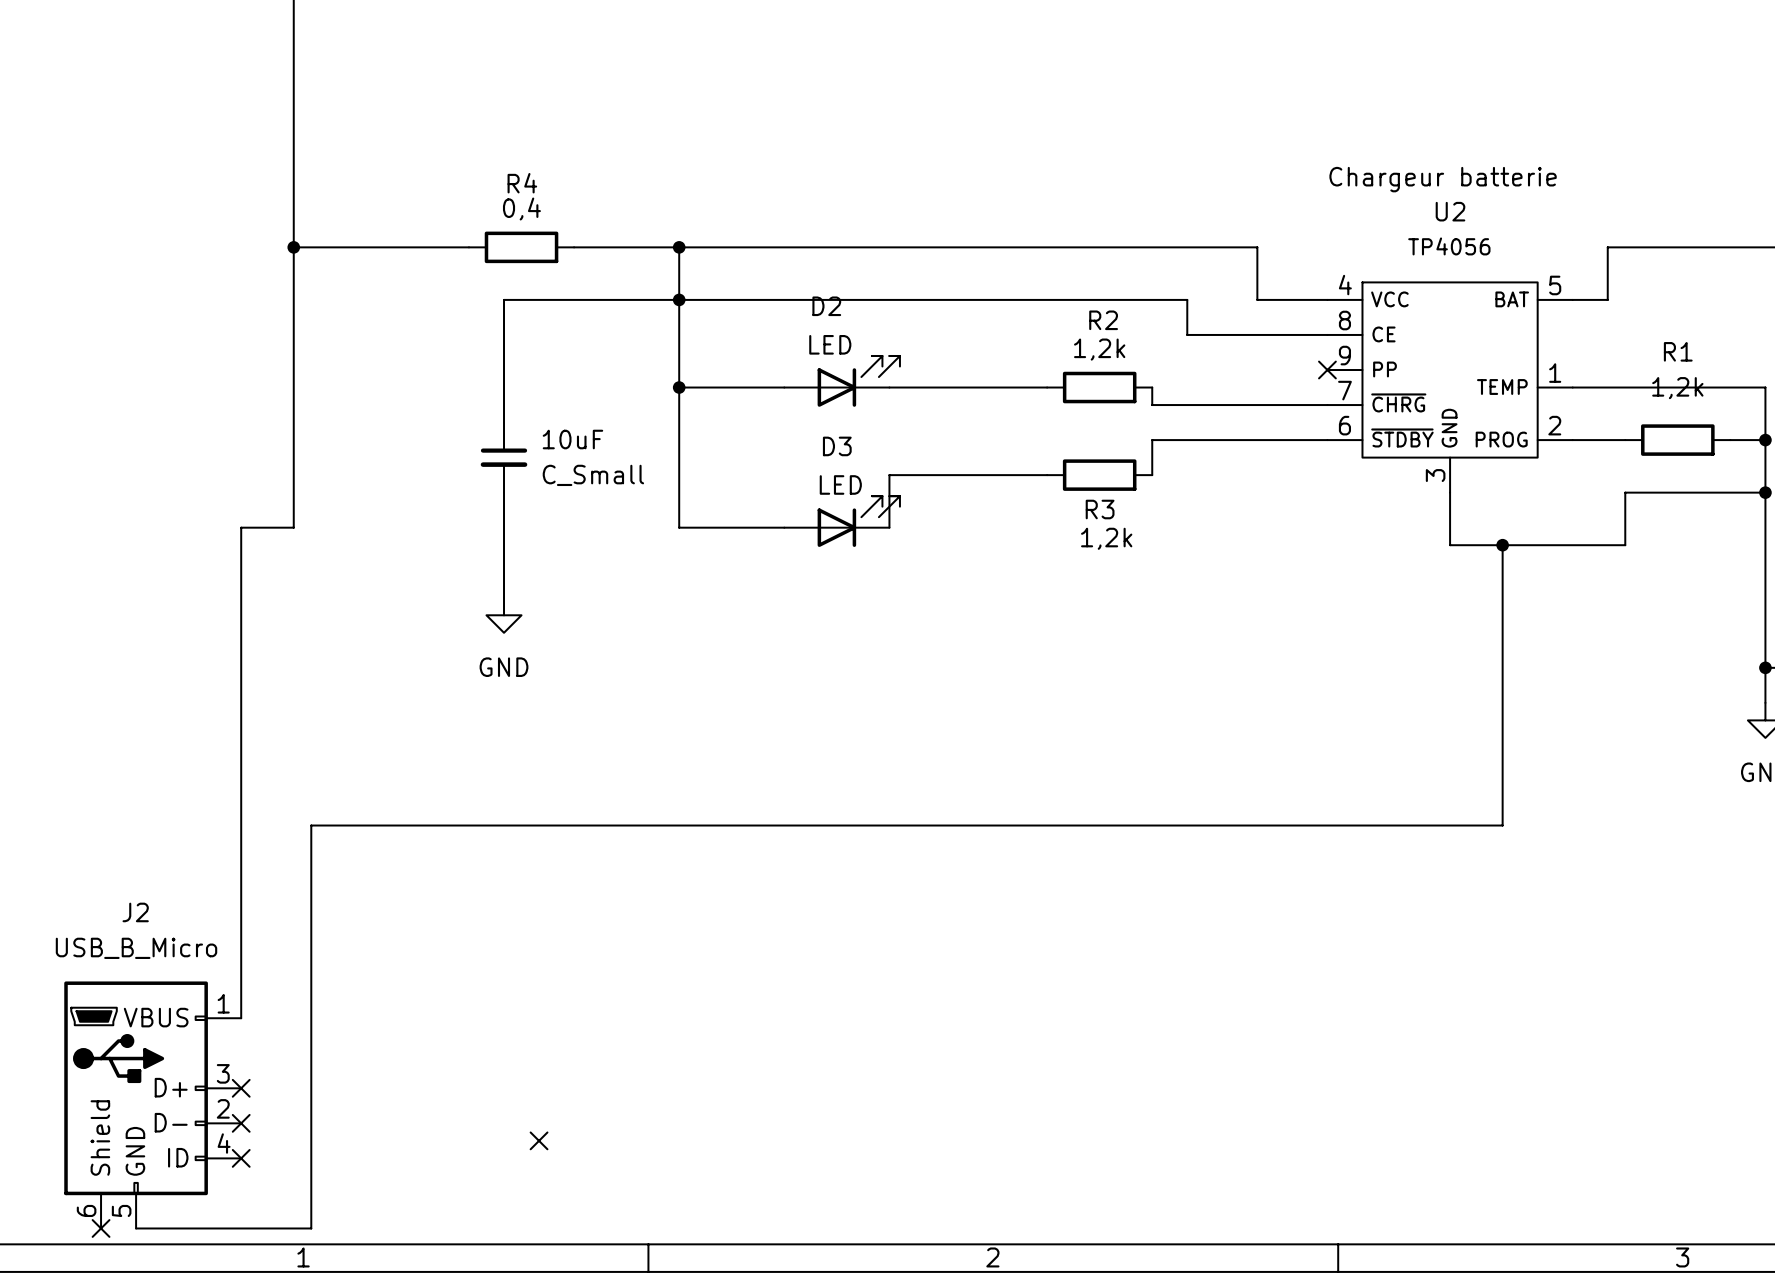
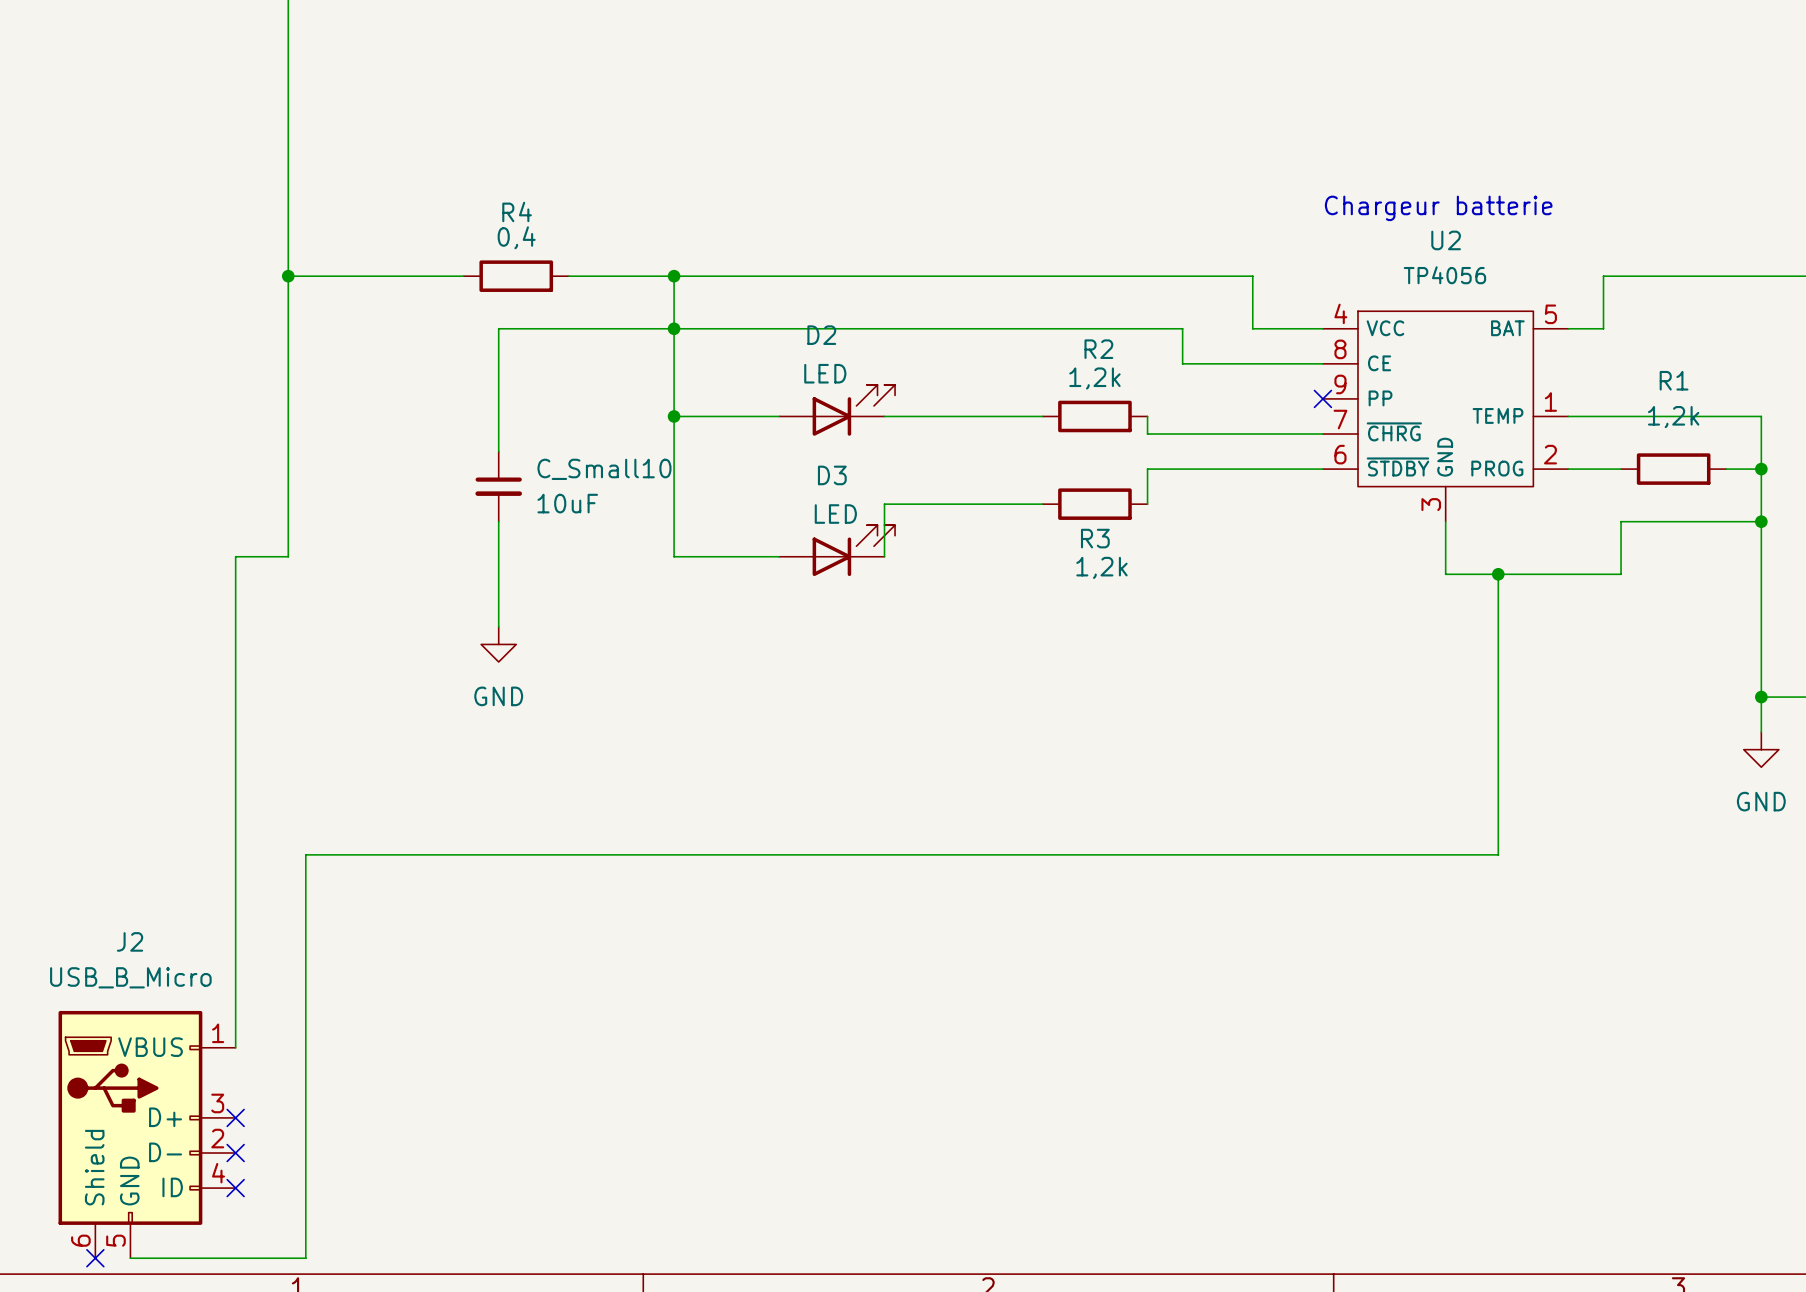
10uF name: 10uF (572, 439) -> C_Small10 (604, 469)
10uF value: C_Small (593, 475) -> 10uF (567, 503)
no-connect mark: (539, 1140) -> none

